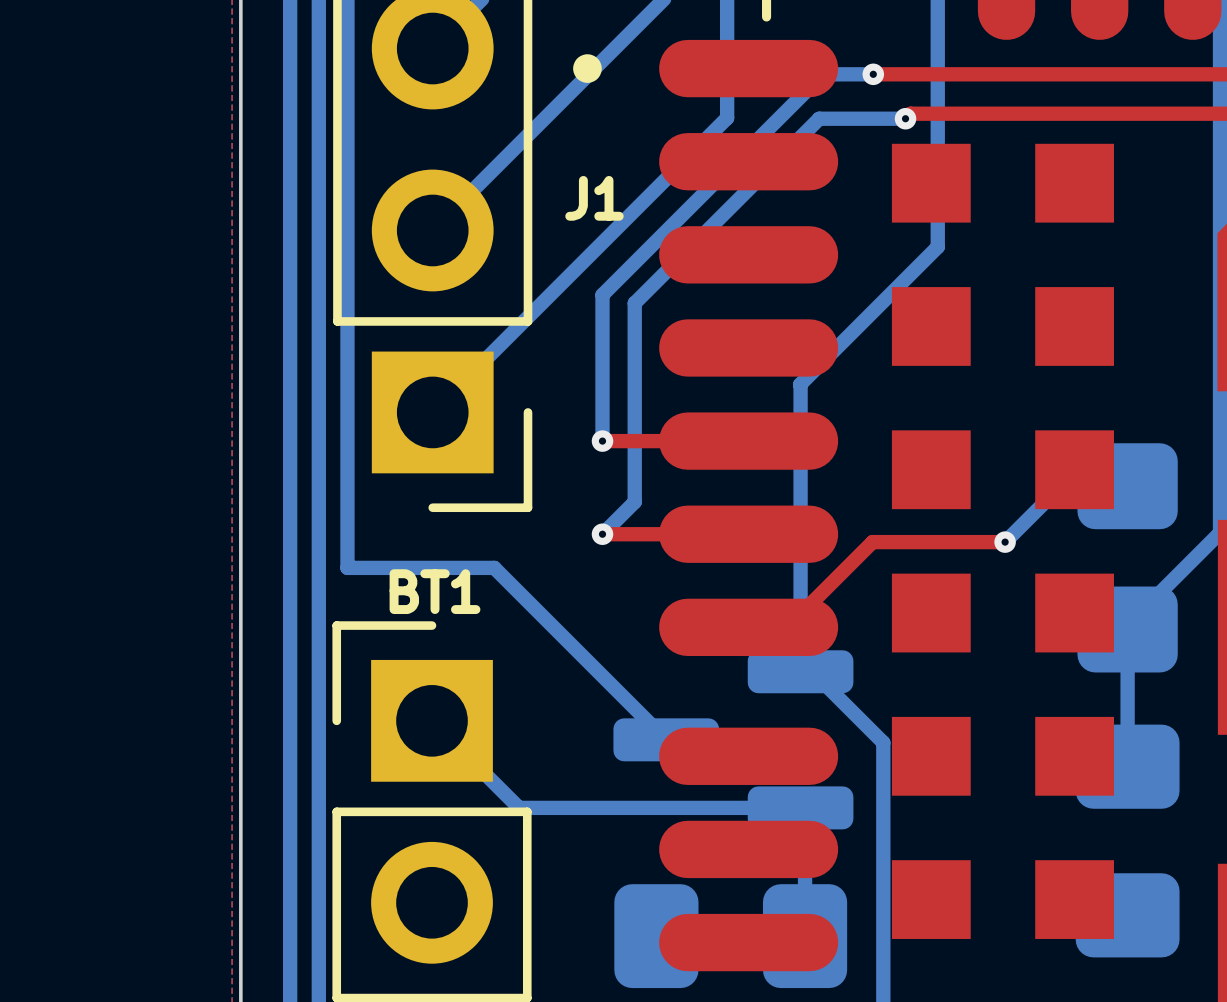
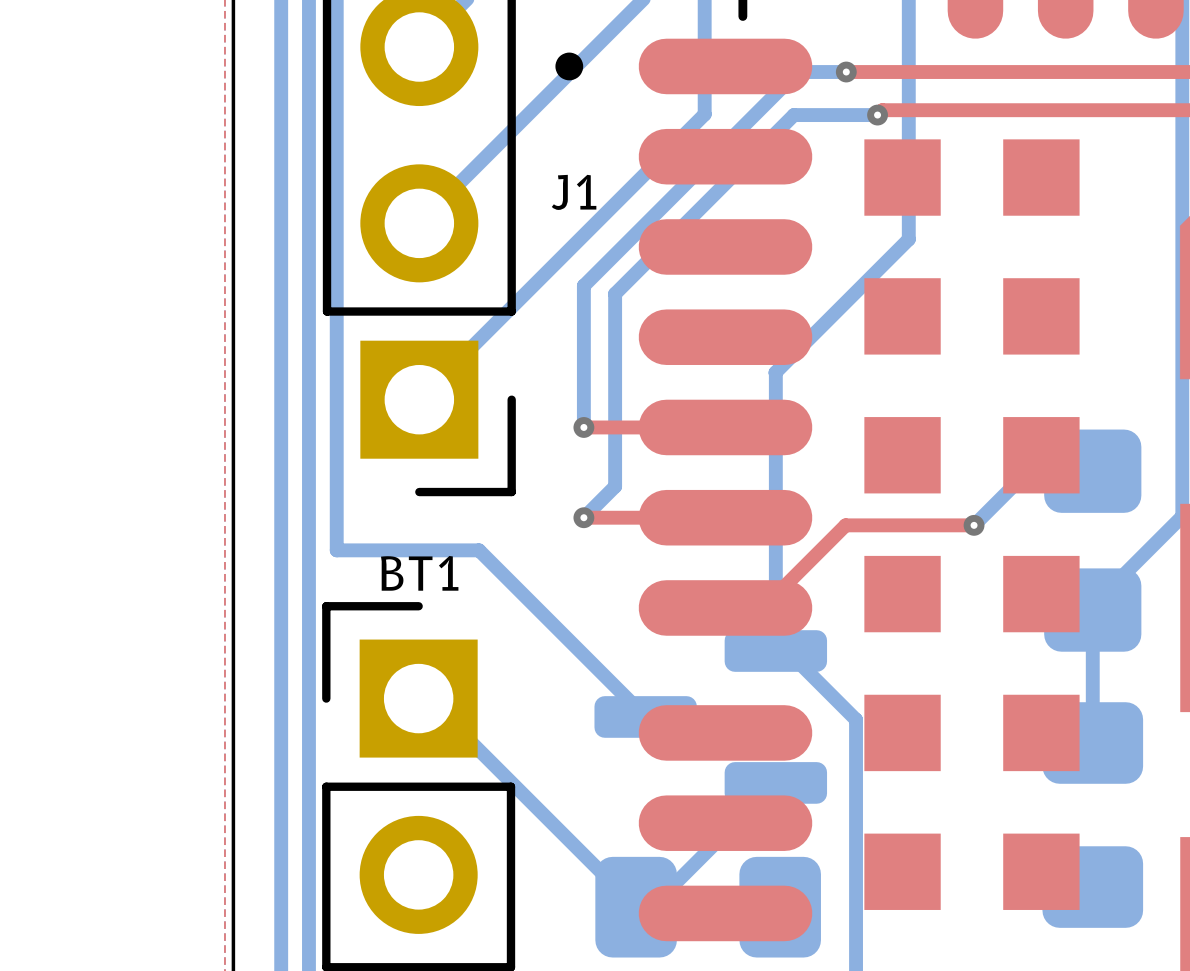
bottom track: (432, 720) (519, 807) (800, 807) (805, 812) (805, 936) -> none
bottom track: none -> (427, 698) (636, 907) (651, 907) (775, 782)

